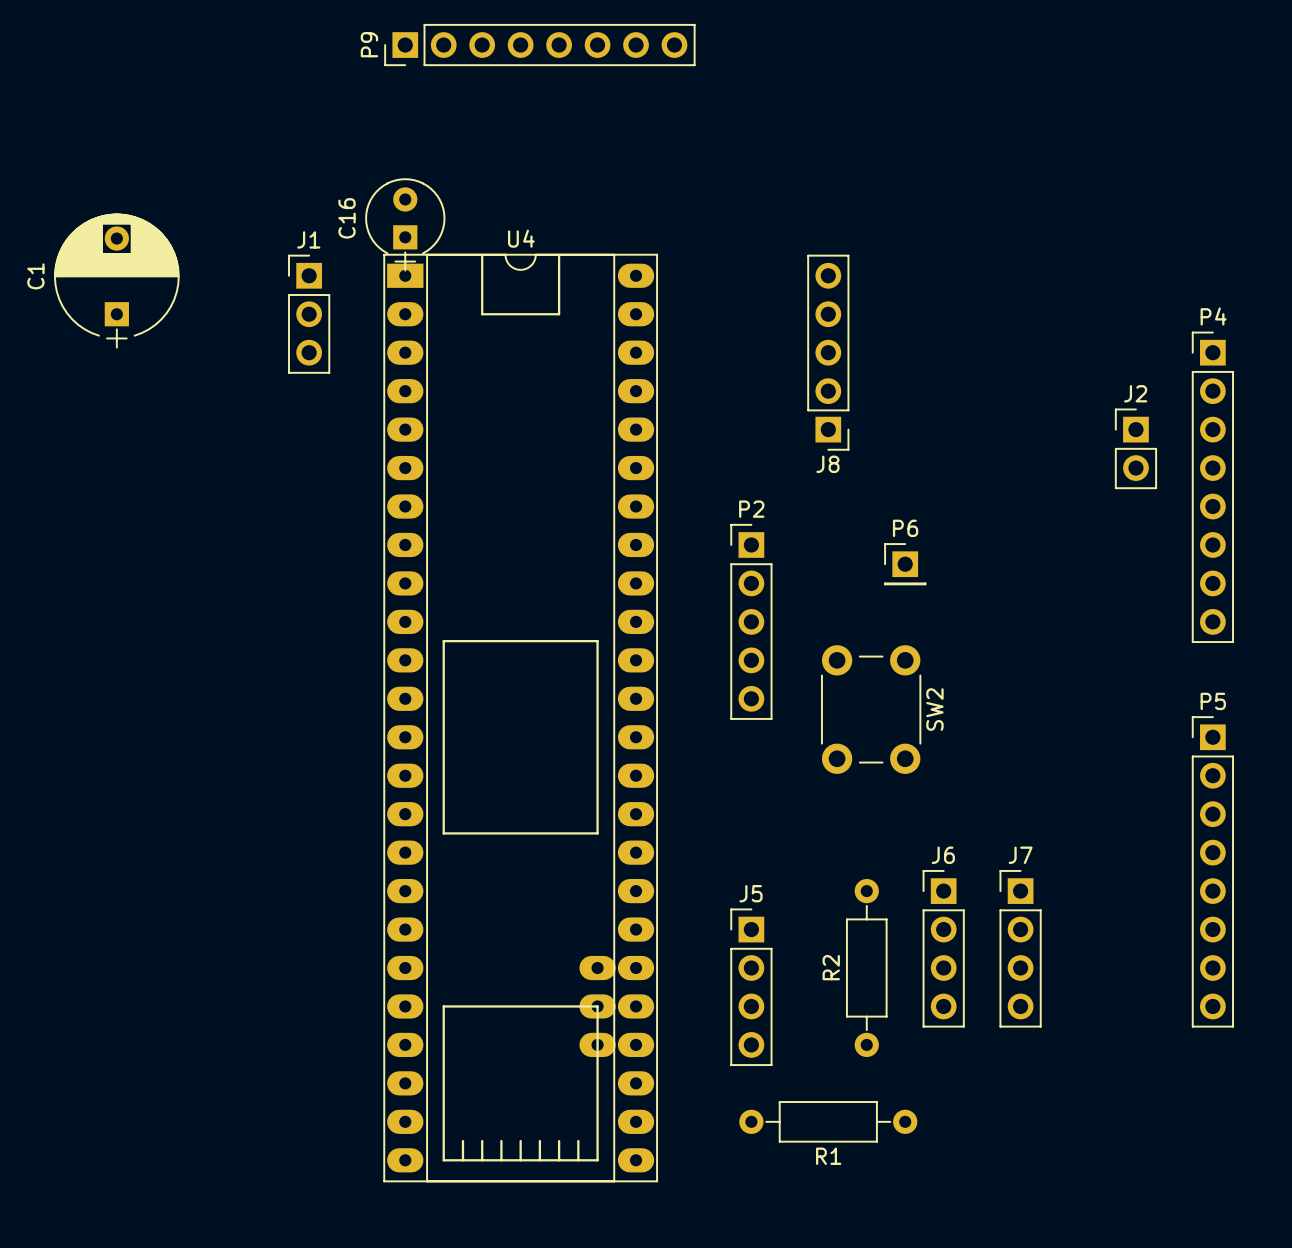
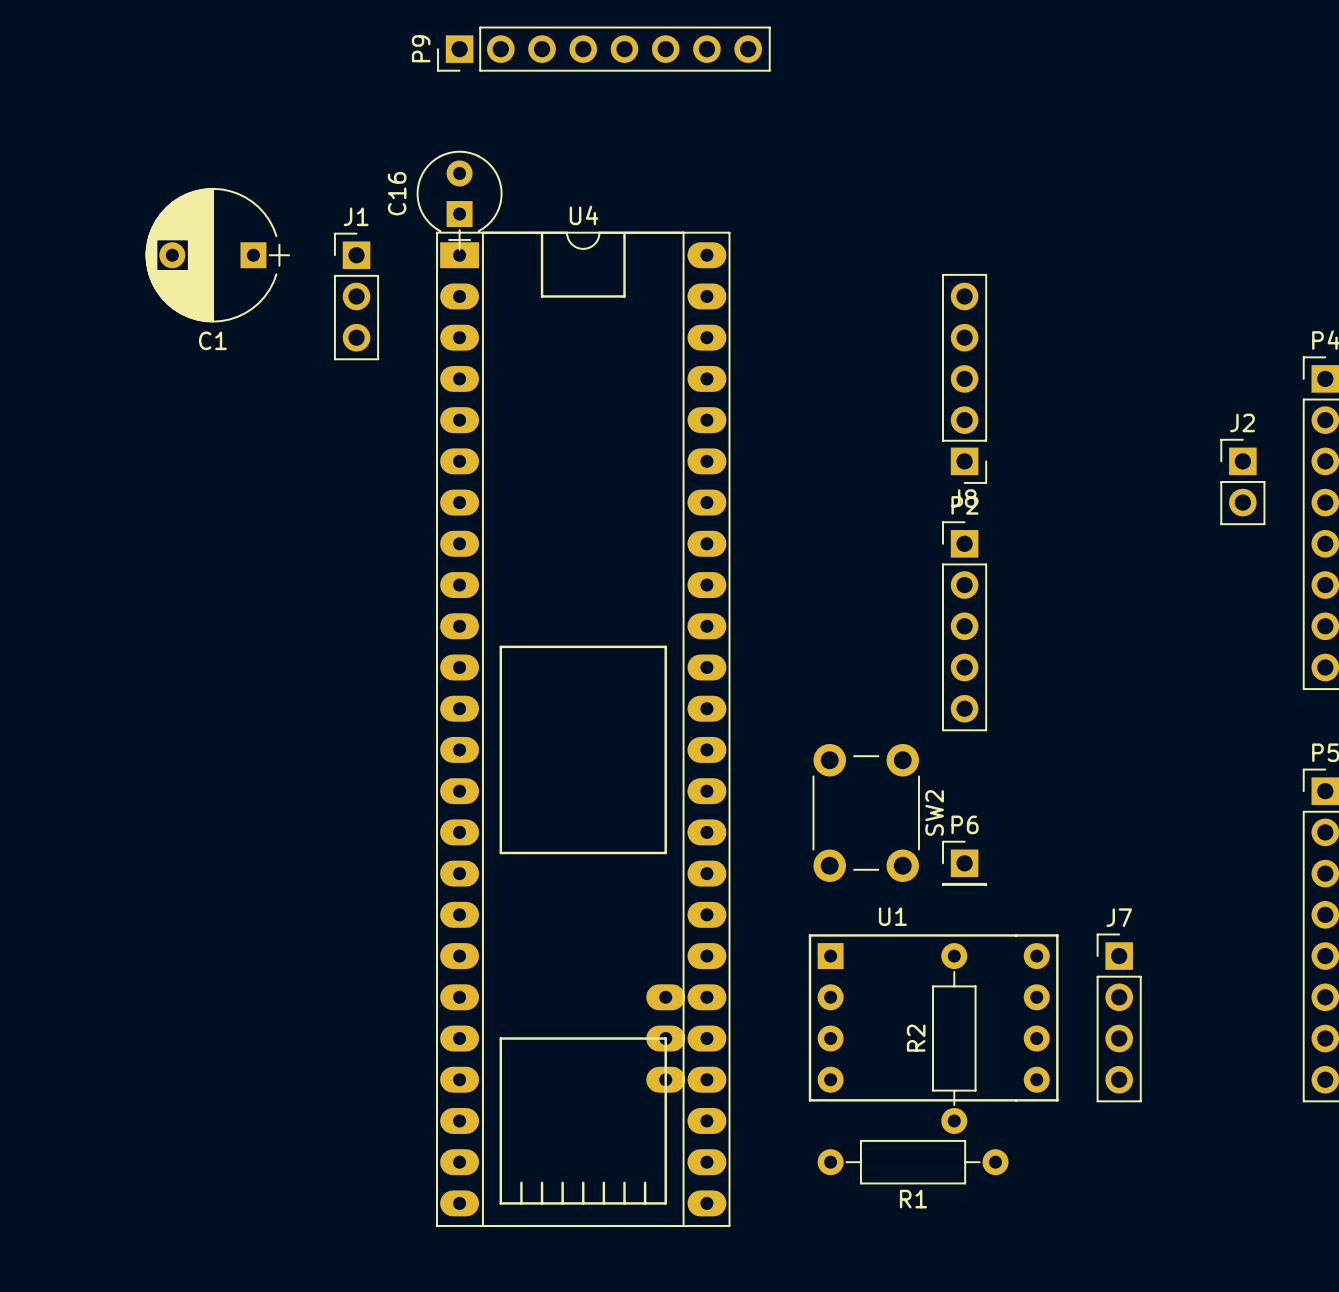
C16 position: (405, 224) -> (459, 200)
C1 rotation: 0° (116, 281) -> 90° counterclockwise (217, 255)
J1 position: (309, 314) -> (356, 296)
J8 position: (828, 352) -> (964, 378)
P6 position: (905, 564) -> (964, 863)
P2 position: (751, 621) -> (964, 626)
SW2 position: (871, 709) -> (866, 812)
U4 position: (520, 718) -> (583, 729)
U1: none -> (933, 1017)
J6: (943, 948) -> none
J5: (751, 987) -> none
R1 position: (828, 1121) -> (913, 1162)

